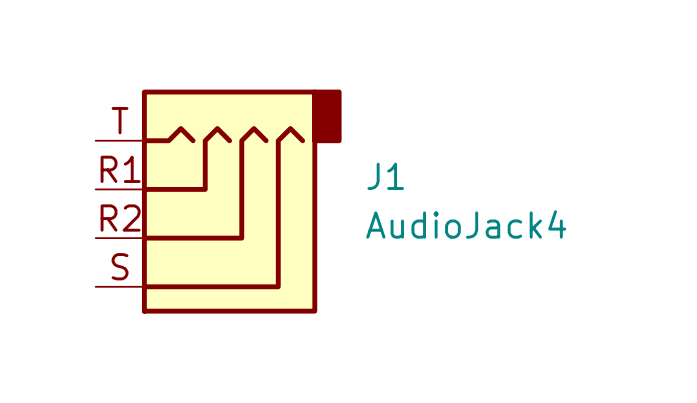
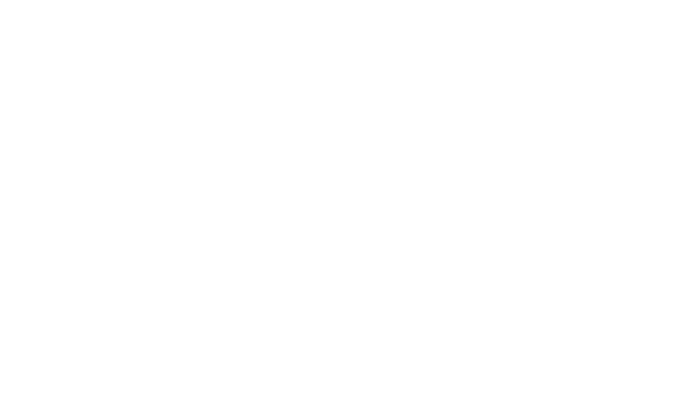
J1: AudioJack4 (218, 201) -> none

